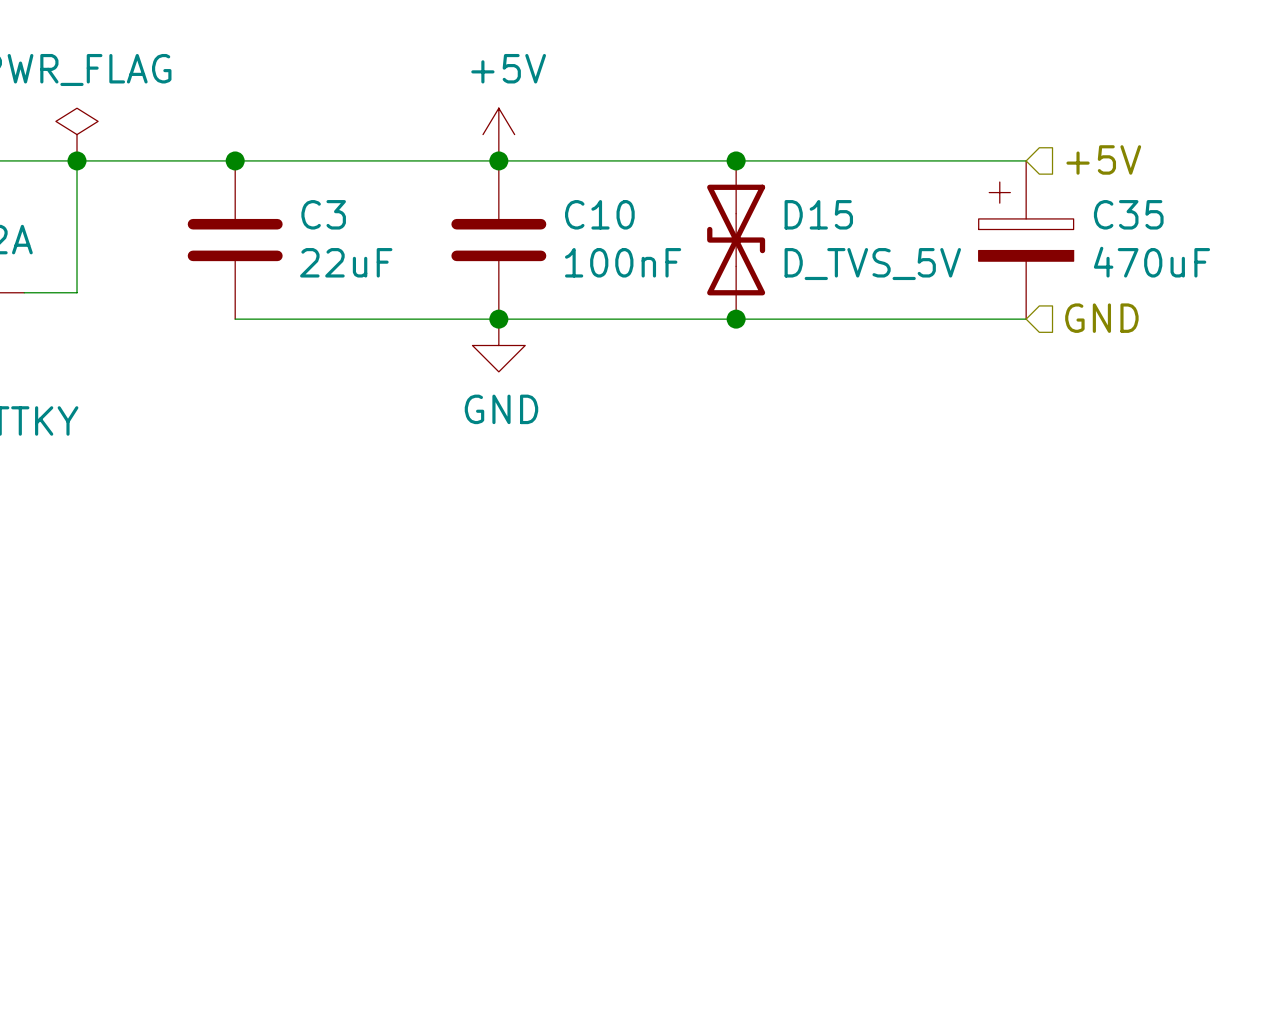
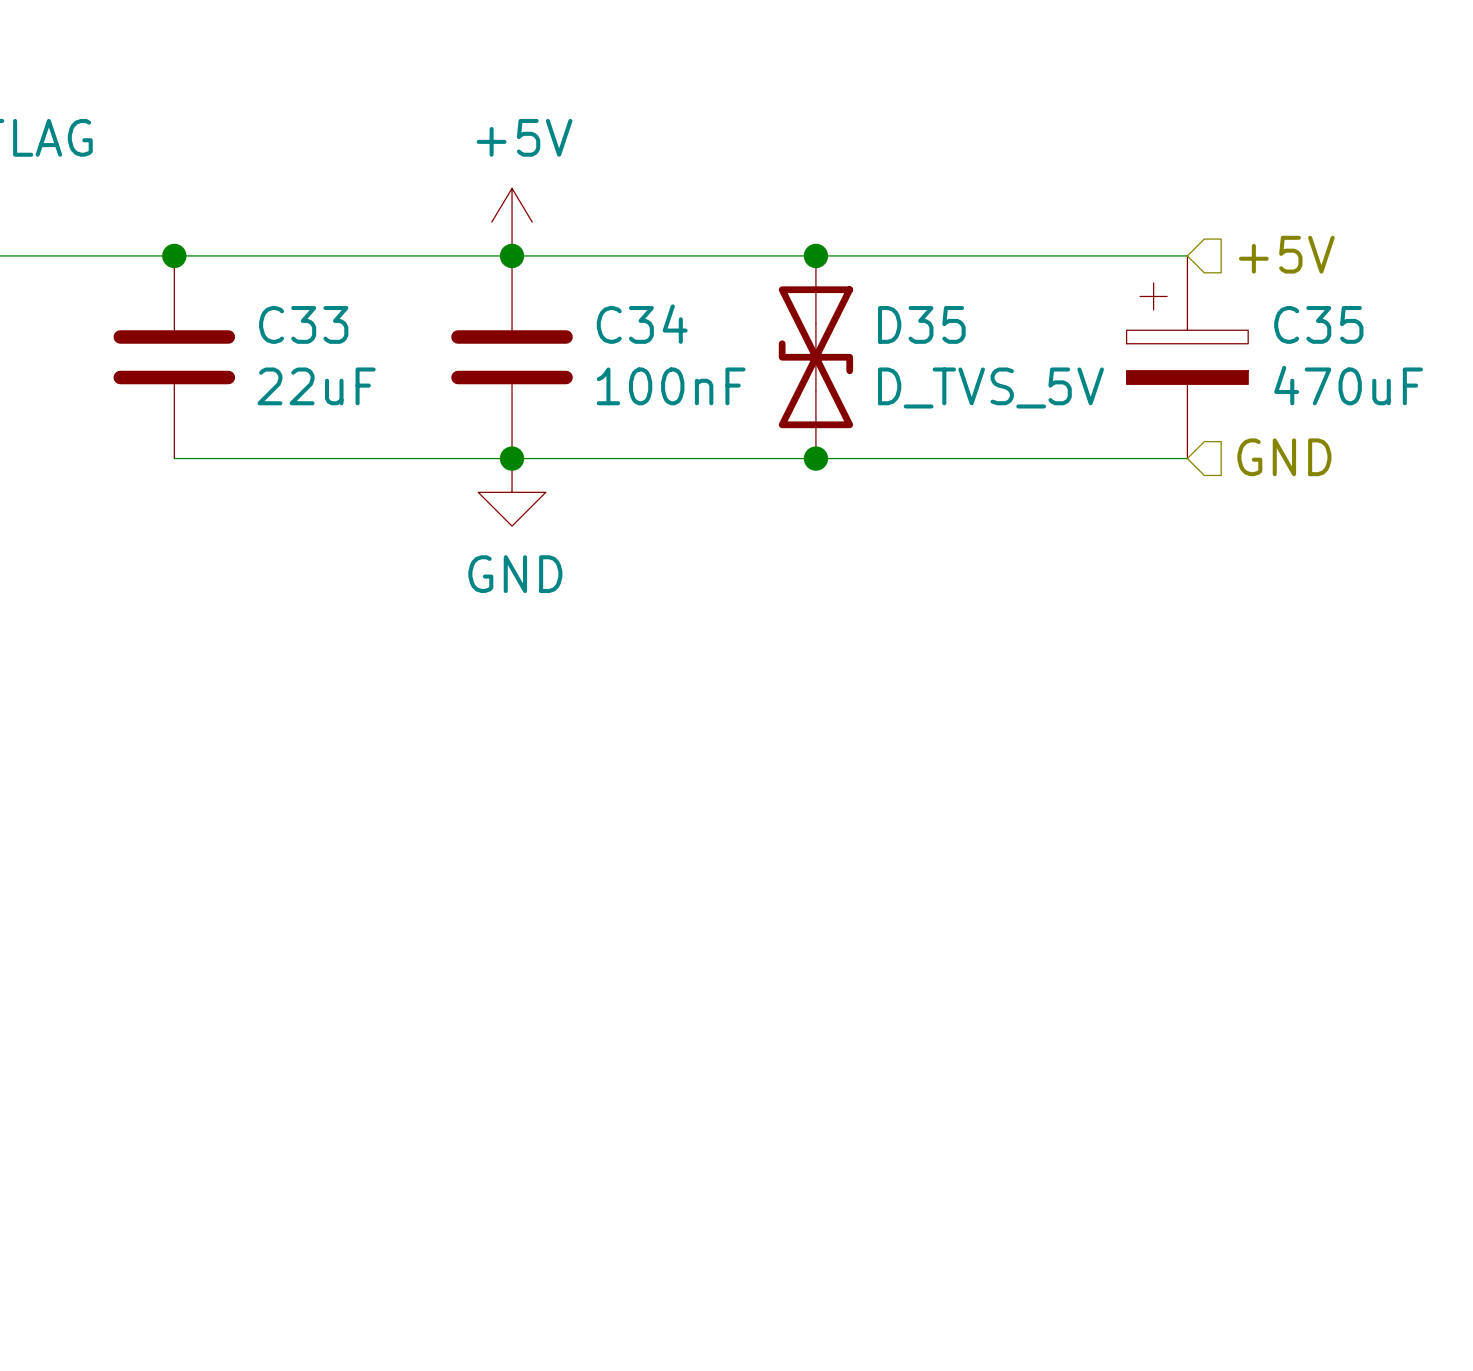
C3 name: C3 (323, 214) -> C33 (303, 324)
C10 name: C10 (599, 214) -> C34 (642, 324)
D15 name: D15 (818, 214) -> D35 (921, 324)

